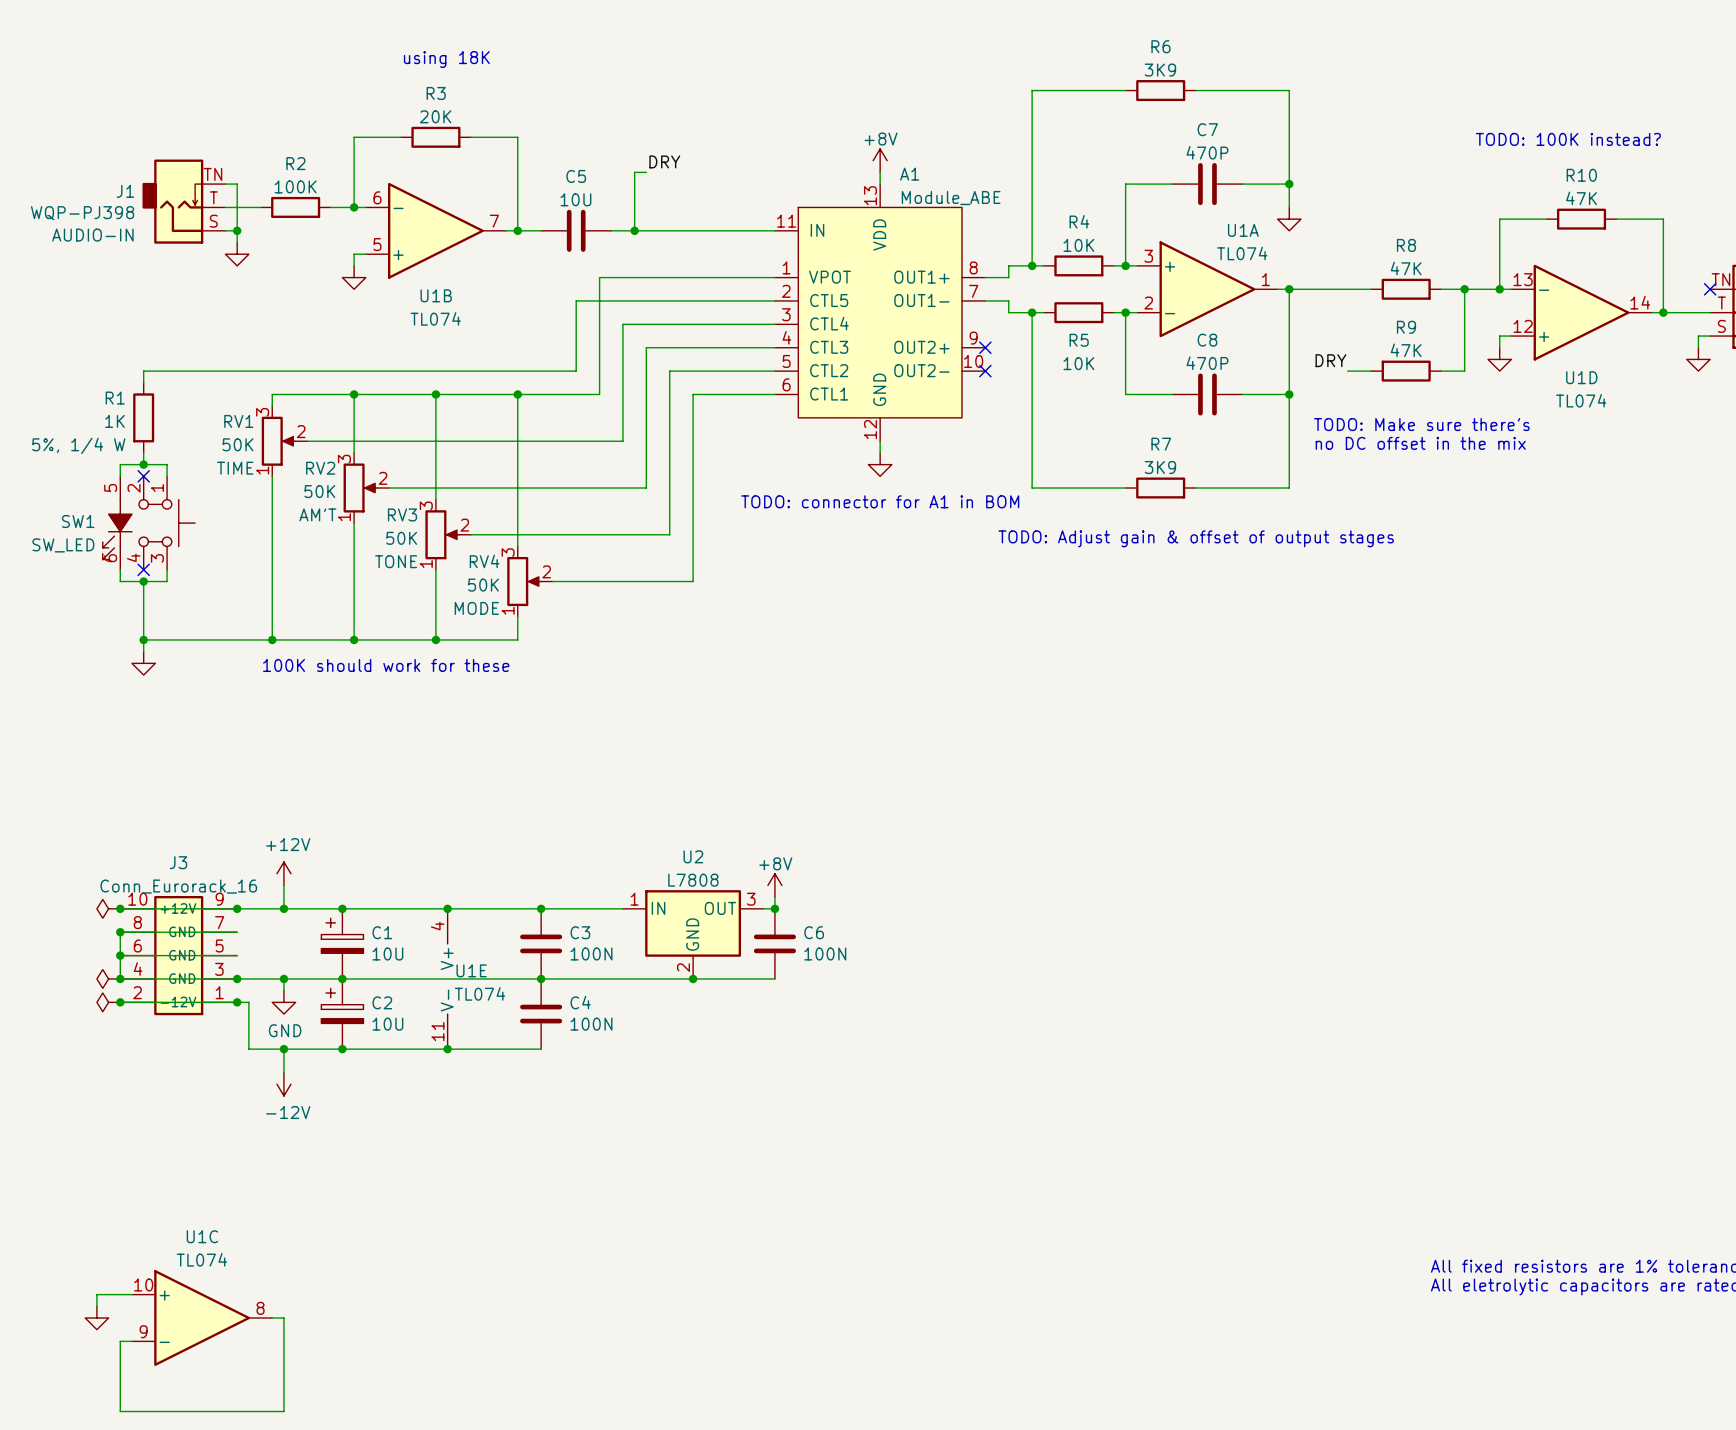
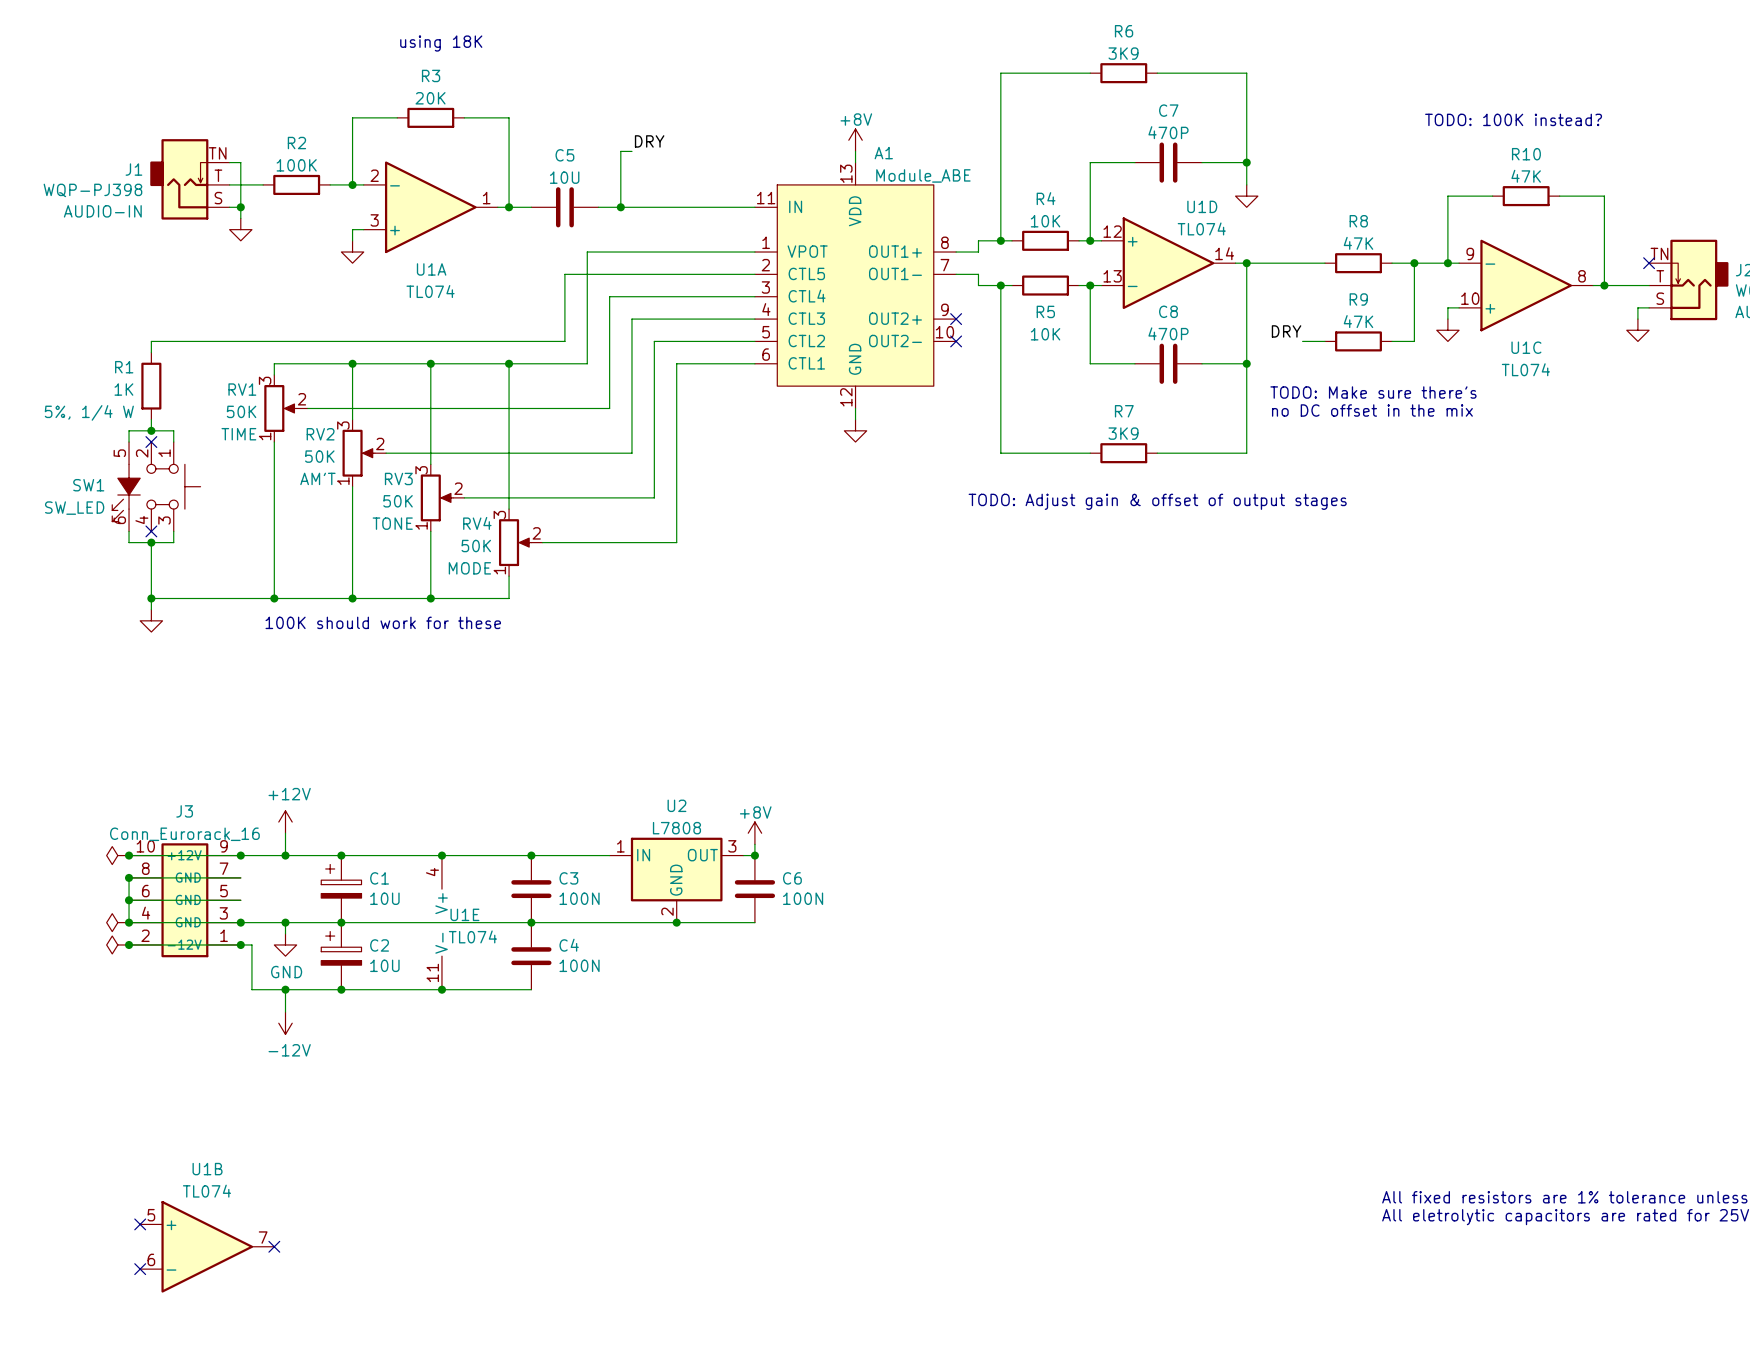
U1B flip: as is (435, 230) -> up-down (207, 1246)
U1B position: (435, 230) -> (207, 1246)
U1A name position: U1A (1243, 230) -> U1A (431, 269)
U1A flip: as is (1207, 289) -> up-down (430, 207)
U1A position: (1207, 289) -> (430, 207)
U1D flip: as is (1581, 312) -> up-down (1168, 263)
U1D position: (1581, 312) -> (1168, 263)
U1D name position: U1D (1581, 377) -> U1D (1202, 206)
text: TODO: connector for A1 in BOM (880, 501) -> none
wire: (131, 1294) (96, 1294) (96, 1306) -> none
no-connect mark: none -> (140, 1224)
power symbol: (96, 1317) -> none
U1C flip: as is (202, 1317) -> up-down (1526, 285)
U1C position: (202, 1317) -> (1526, 285)
wire: (272, 1317) (283, 1317) (283, 1411) (120, 1411) (120, 1341) (131, 1341) -> none
no-connect mark: none -> (274, 1246)
no-connect mark: none -> (140, 1269)

